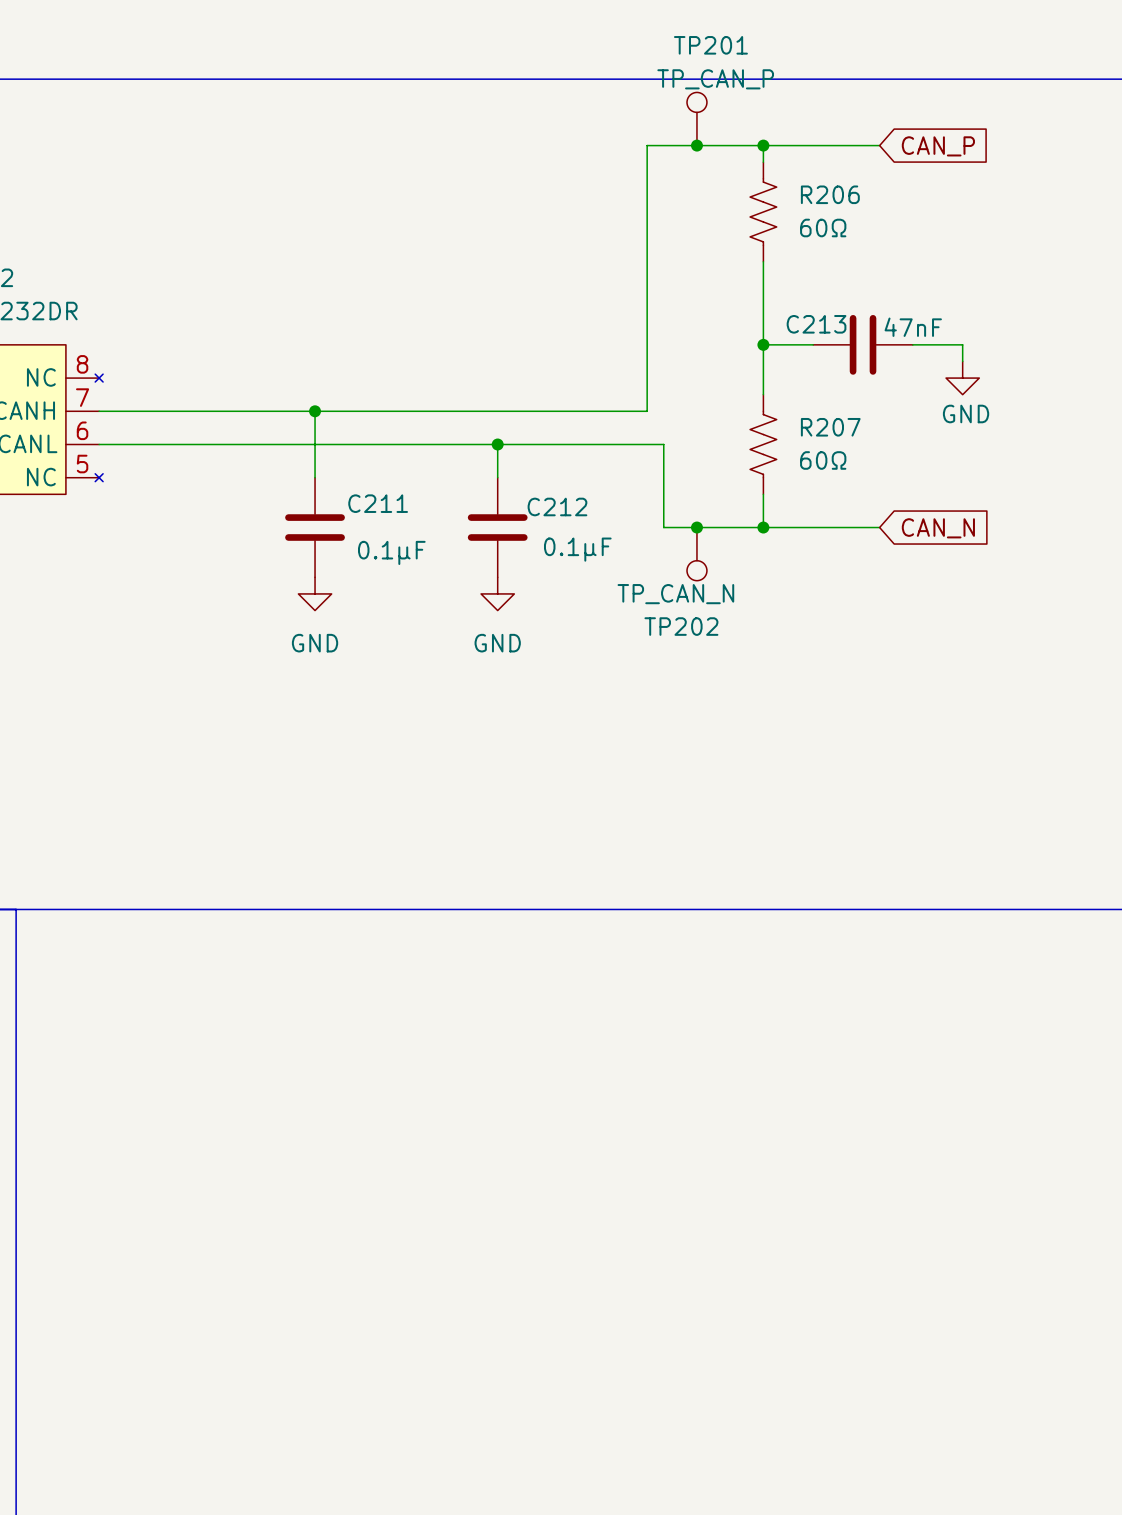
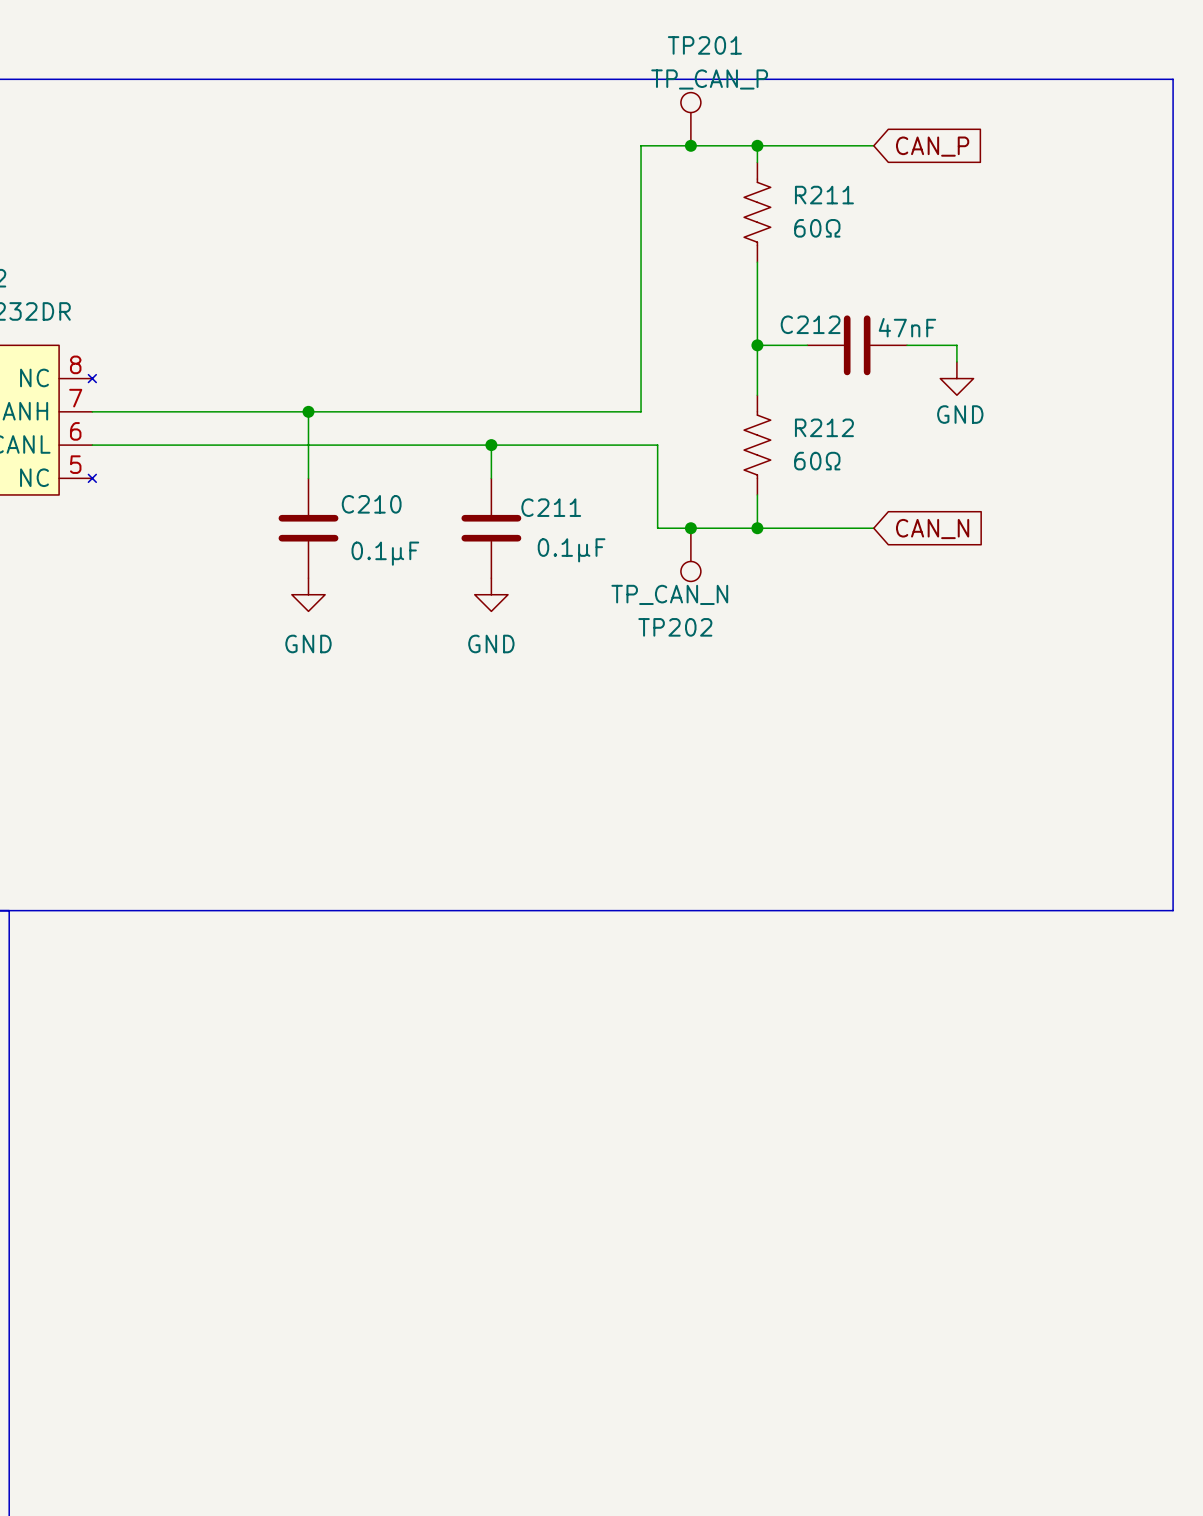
R206 name: R206 (830, 194) -> R211 (824, 195)
C213 name: C213 (816, 324) -> C212 (810, 324)
R207 name: R207 (830, 427) -> R212 (824, 427)
C211 name: C211 (378, 503) -> C210 (371, 504)
C212 name: C212 (557, 506) -> C211 (551, 507)

